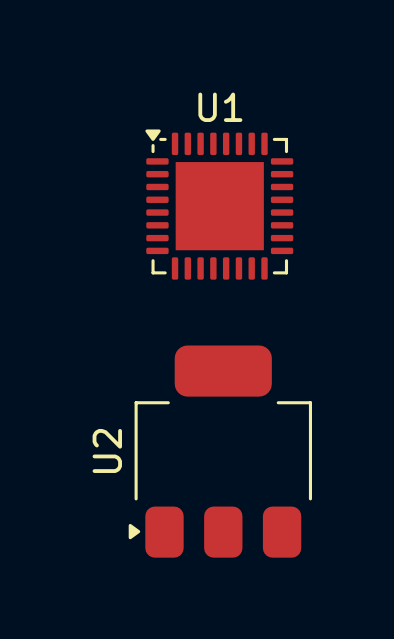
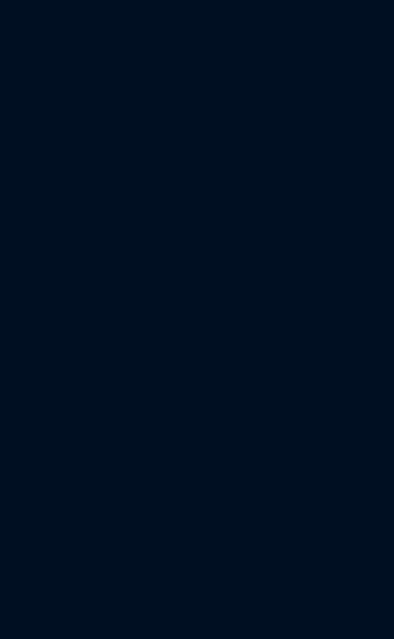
U1: (219, 204) -> none
U2: (220, 451) -> none

